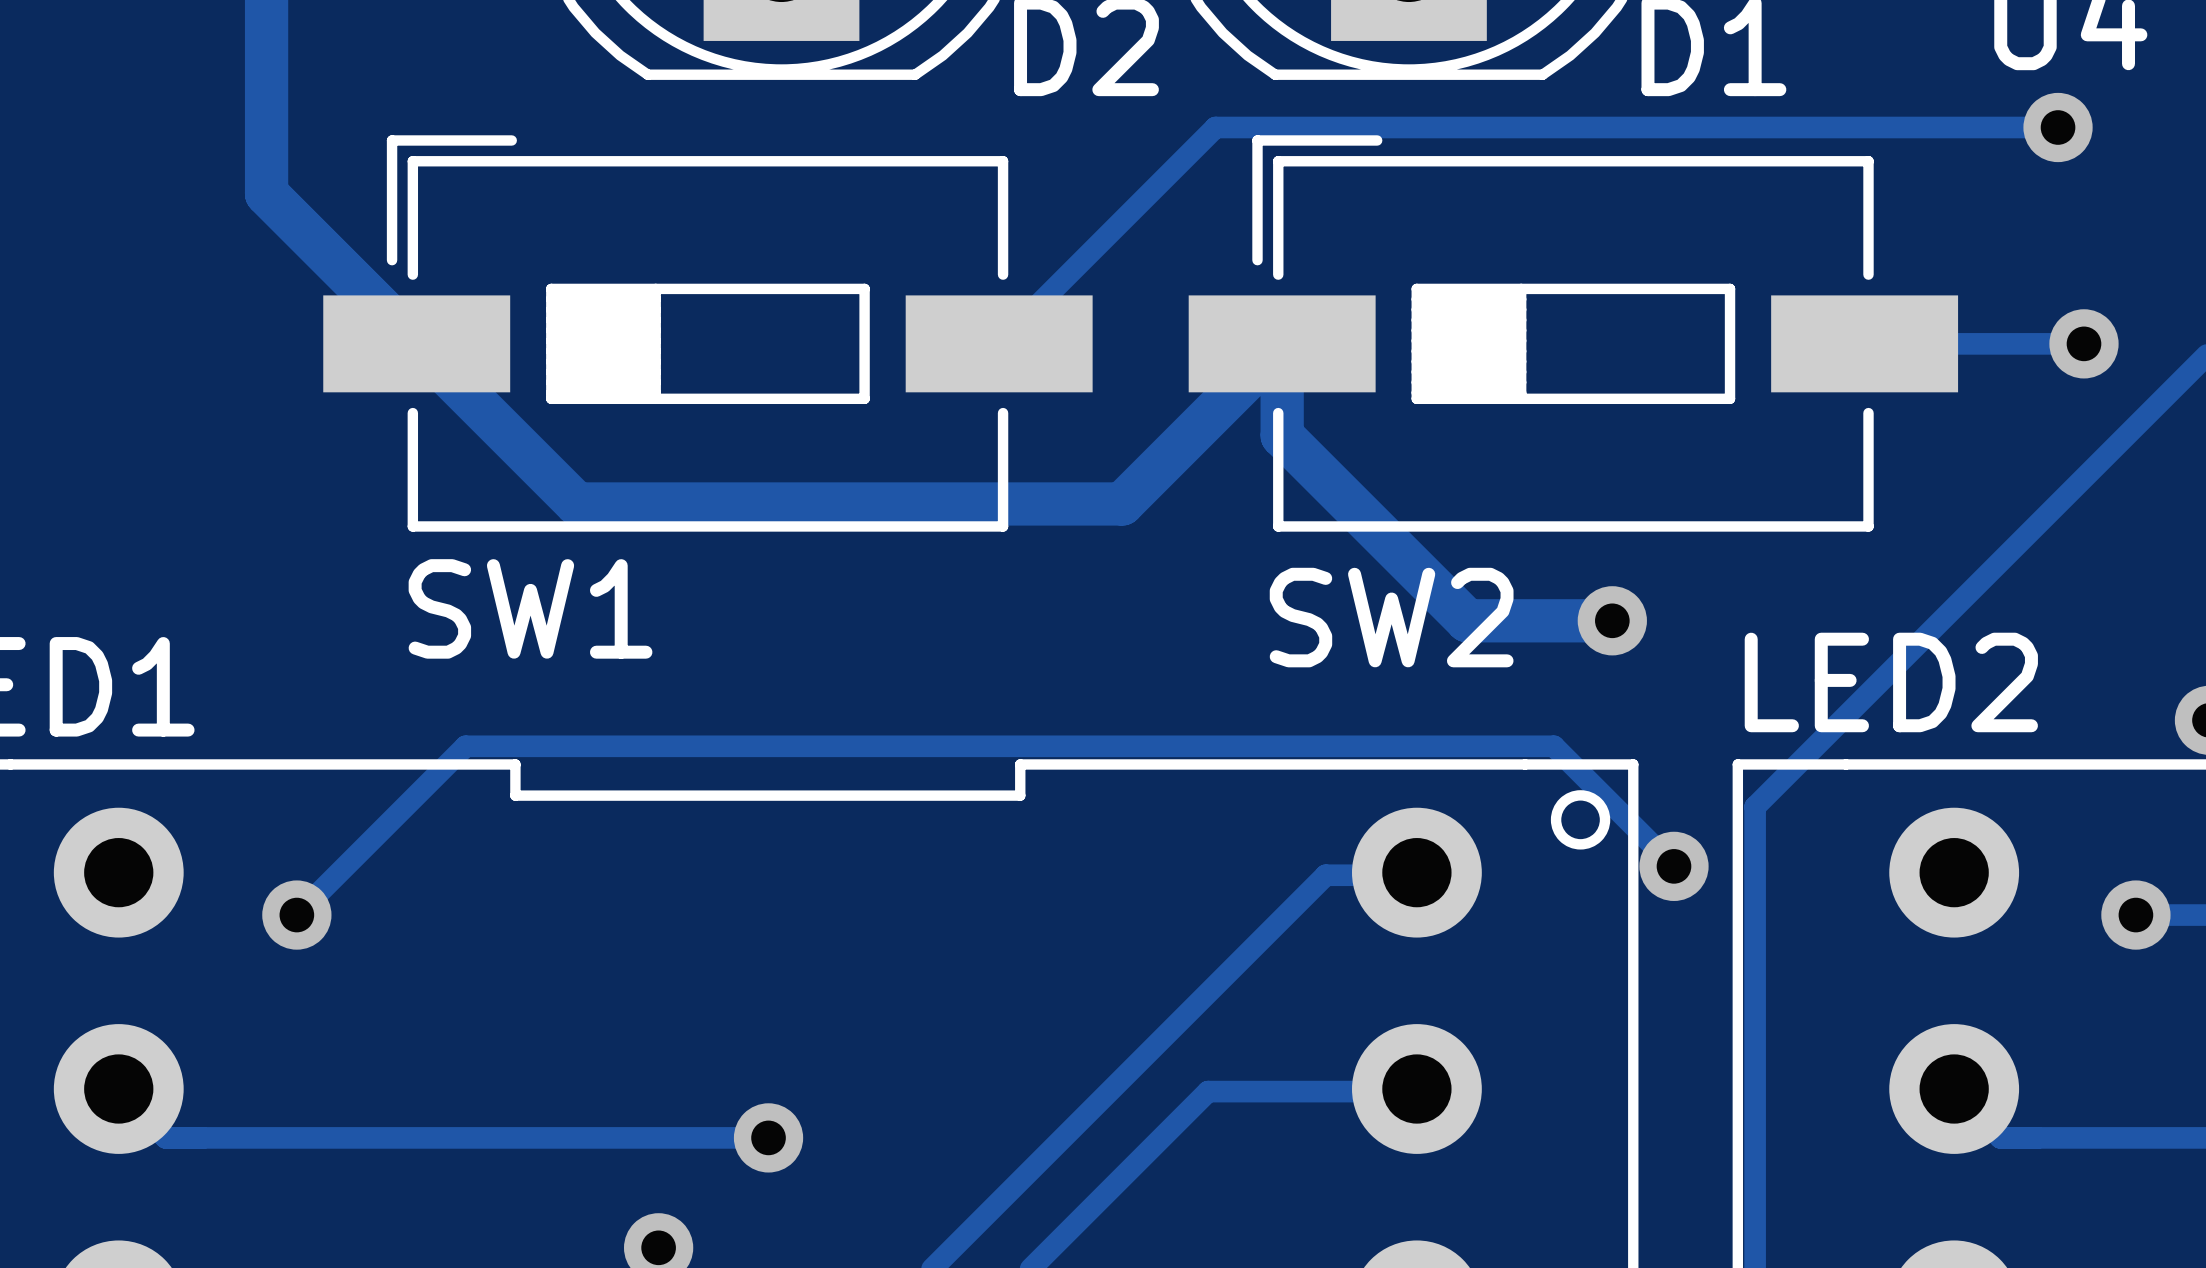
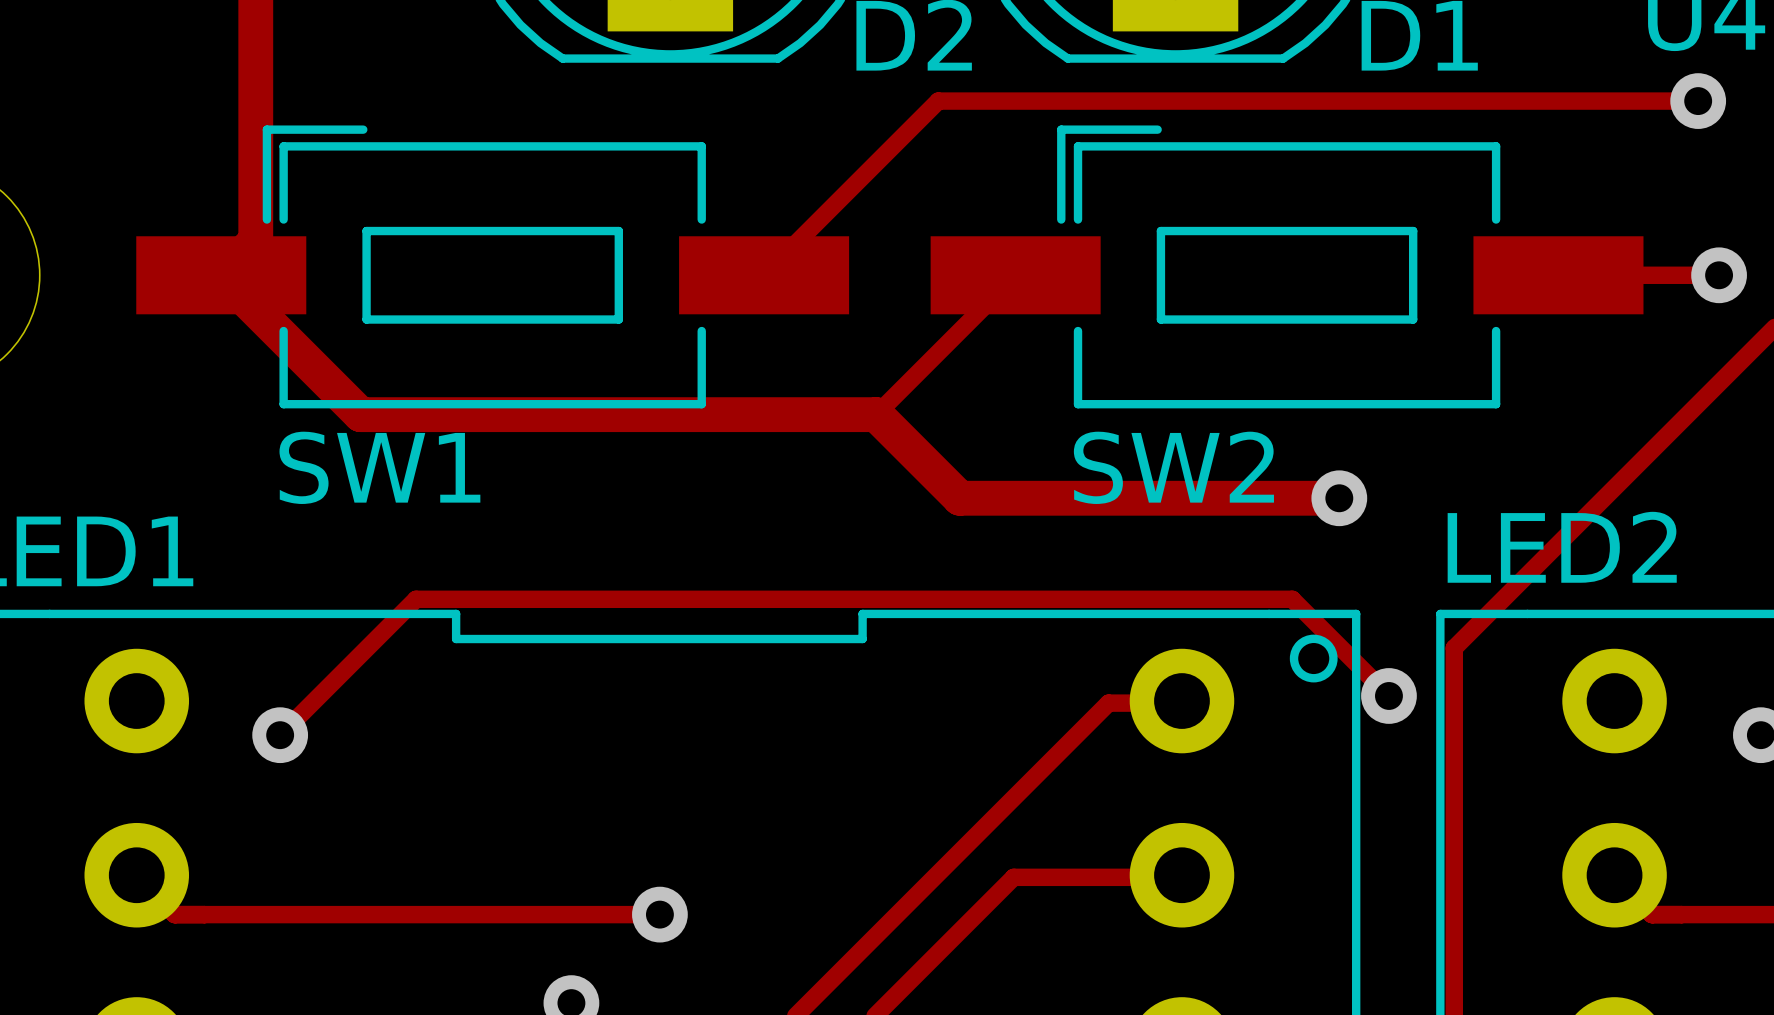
track: (1215, 127) (999, 343) -> (1019, 101) (938, 101) (764, 275)
SW1 footprint: [323, 135, 1093, 532] -> [136, 125, 850, 409]
SW2 footprint: [1188, 135, 1959, 532] -> [930, 125, 1644, 409]
track: (266, 193) (576, 503) (1122, 503) (1282, 343) (1282, 435) (1467, 620) -> (255, 154) (255, 240) (221, 275) (360, 414) (876, 414)
track: none -> (1015, 275) (876, 414)
track: none -> (876, 414) (959, 498) (1222, 498)
SW2 name position: SW2 (1391, 617) -> SW2 (1173, 467)

